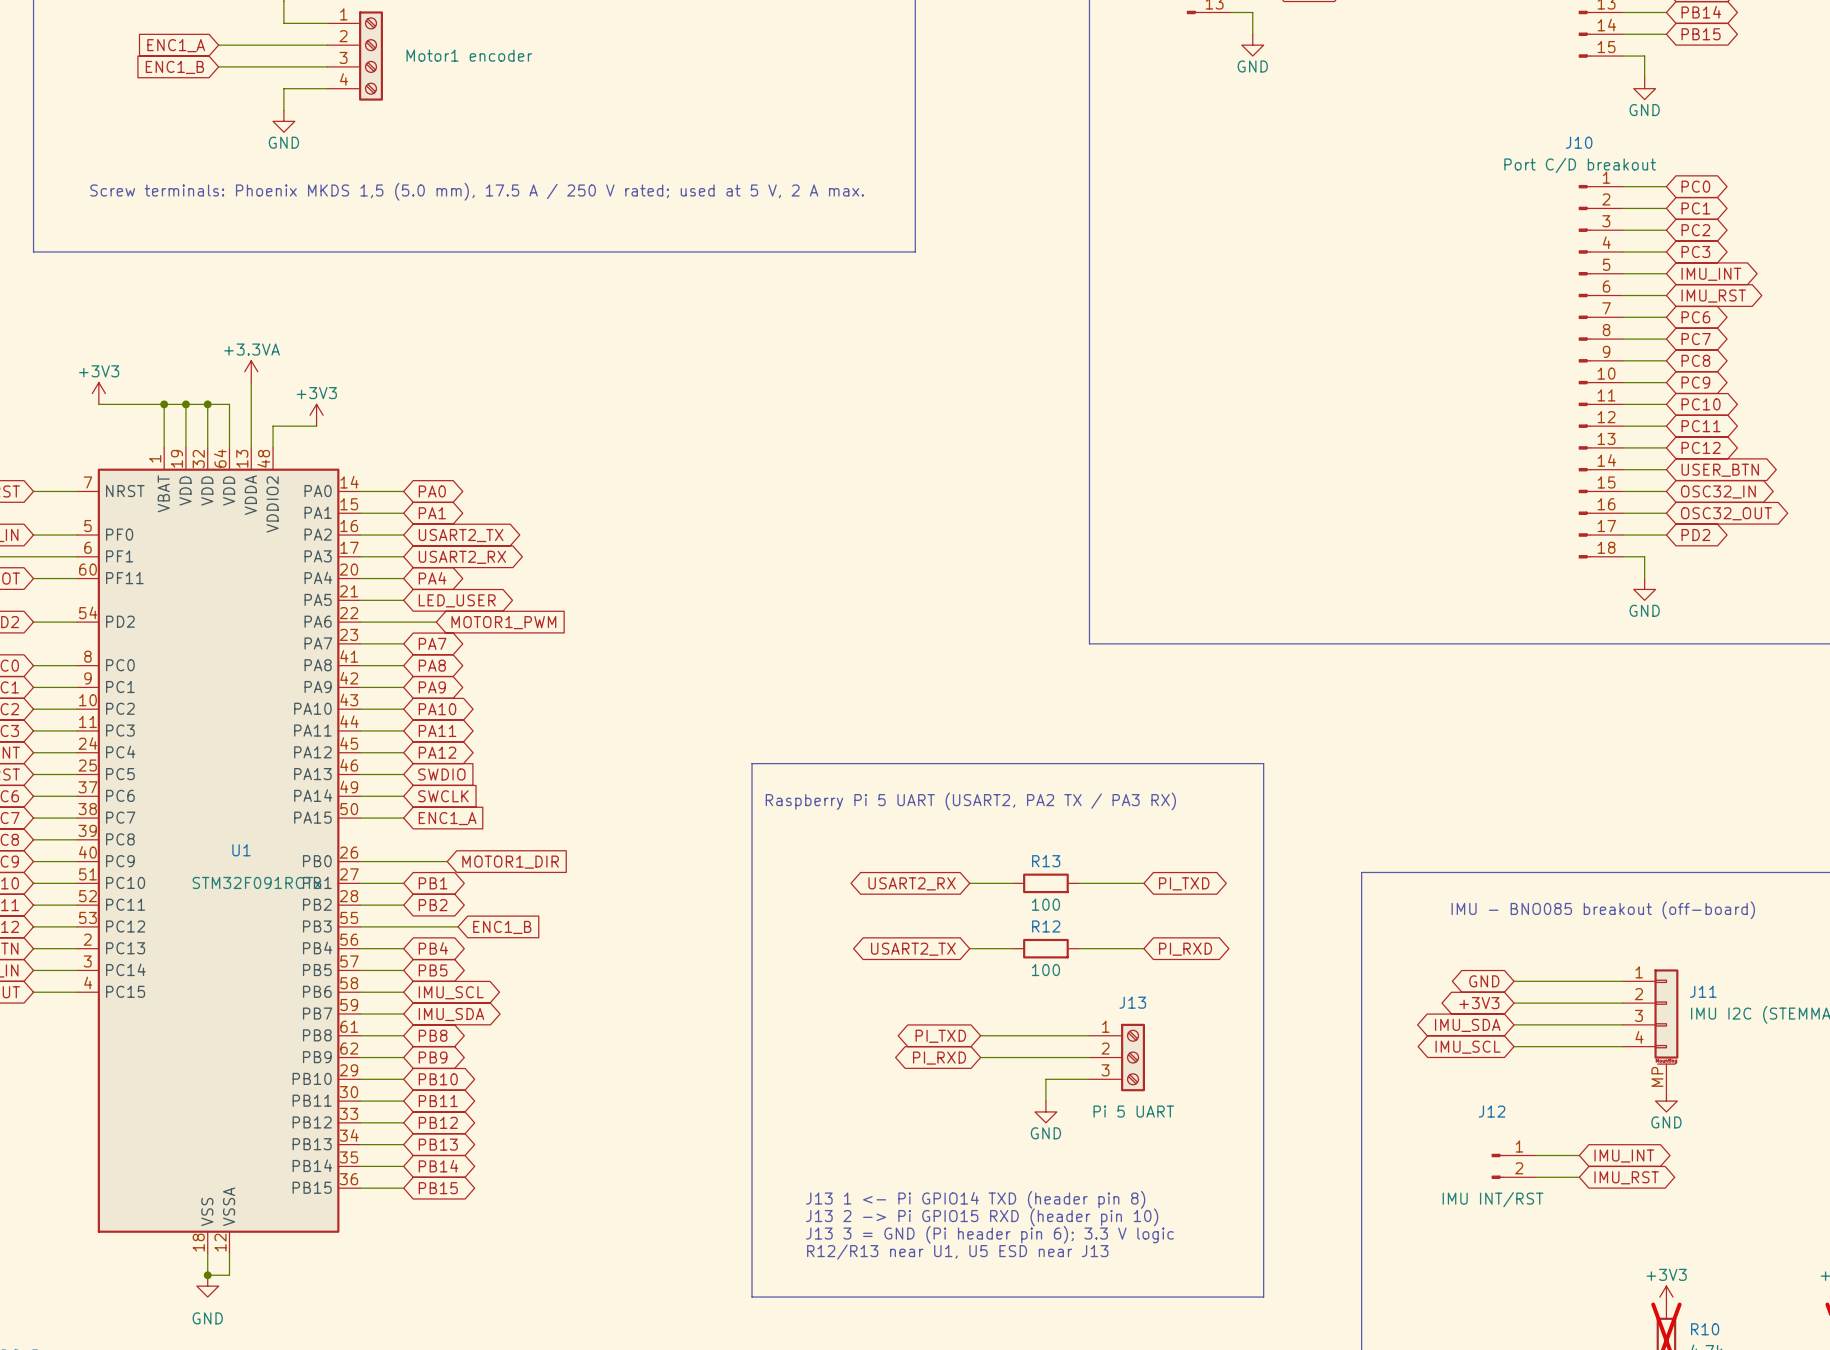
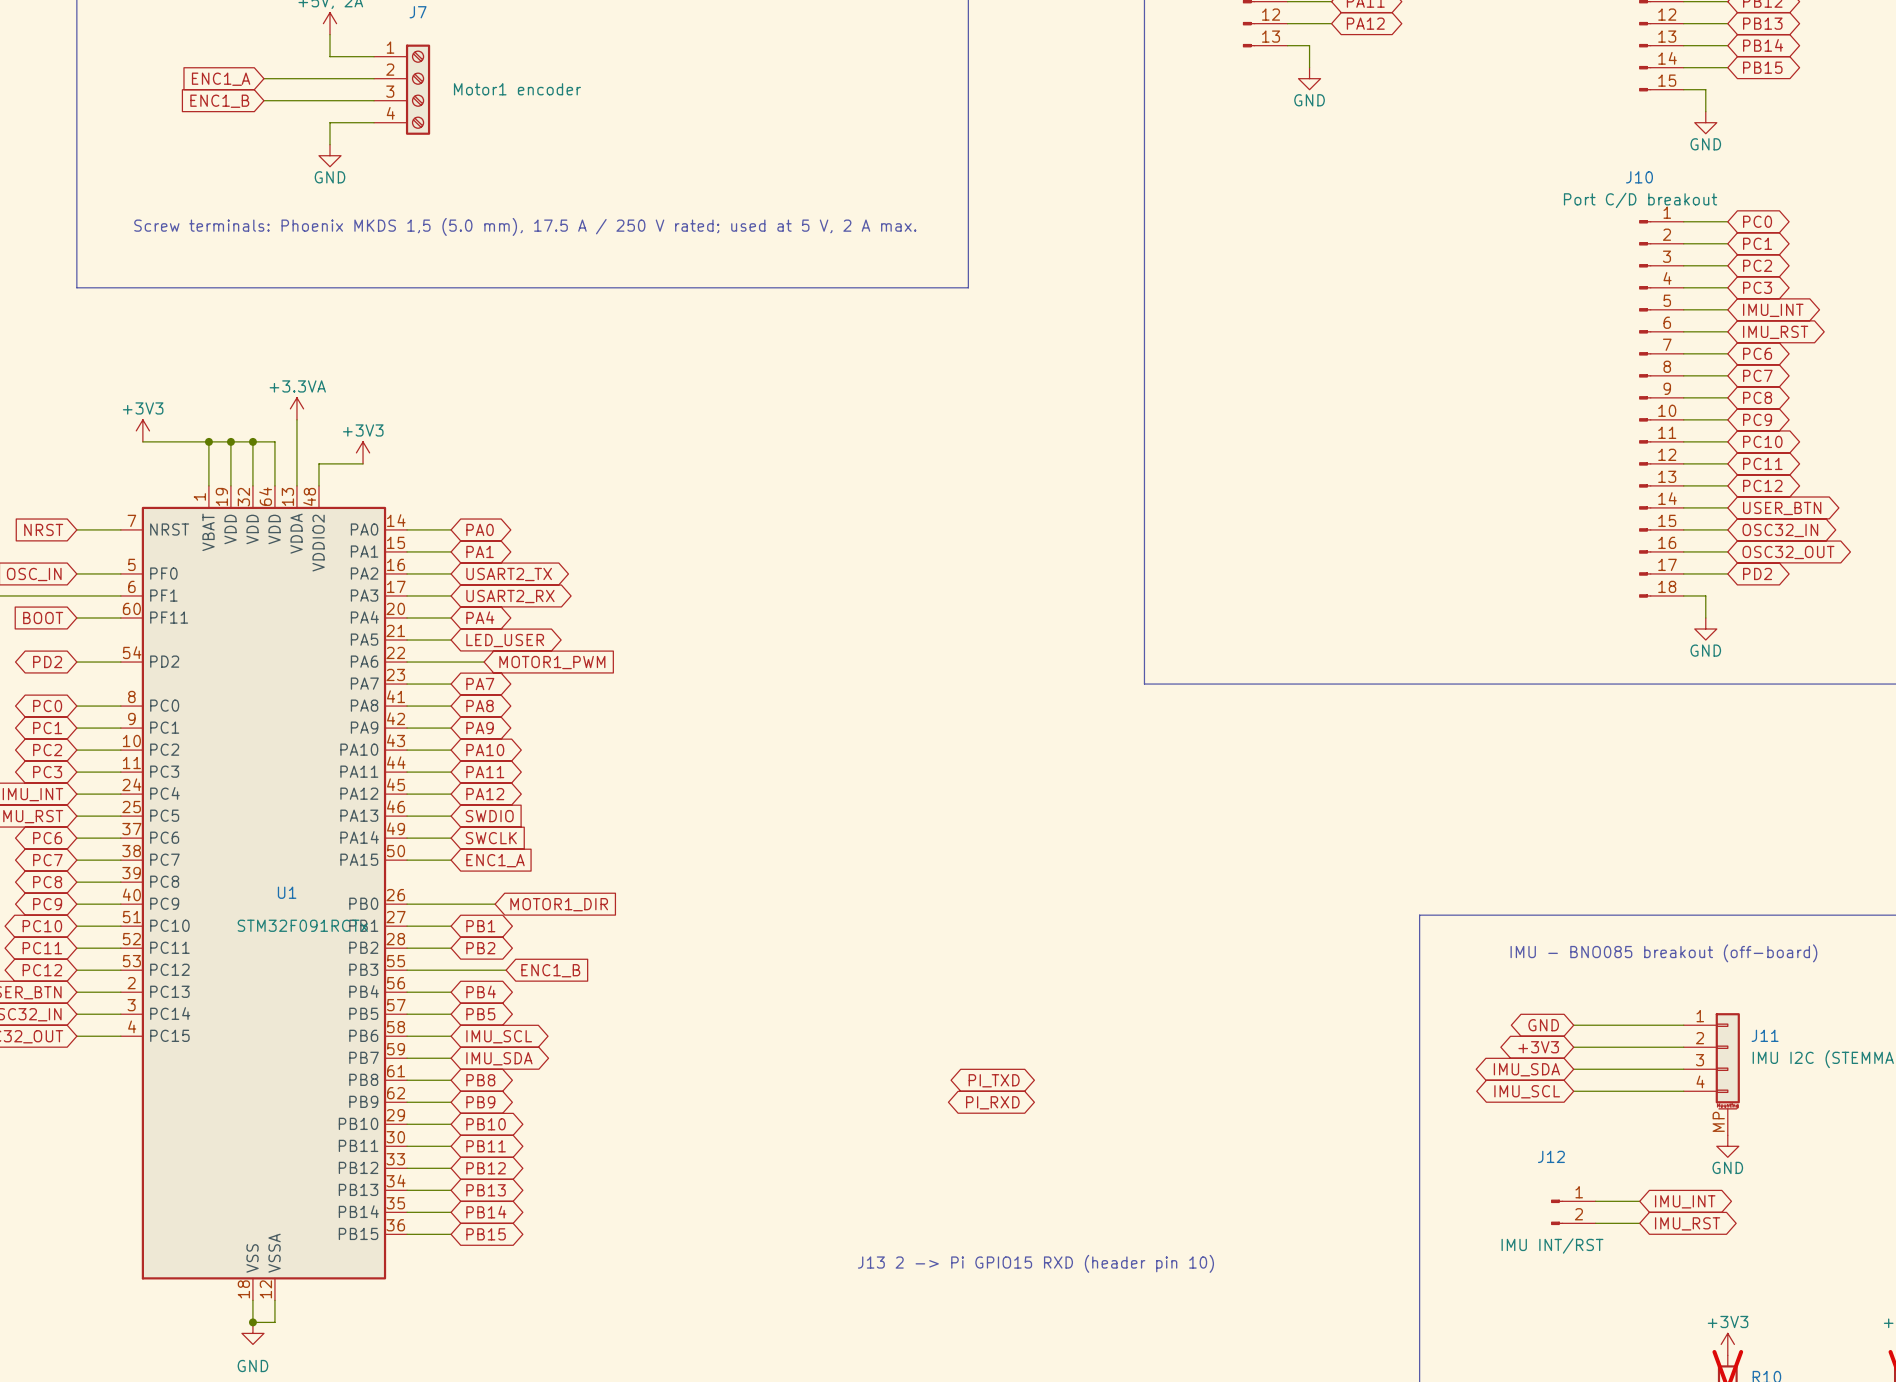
line: (752, 763) (1263, 763) (1263, 1297) (752, 1297) (752, 763) -> none
text: Raspberry Pi 5 UART (USART2, PA2 TX / PA3 RX) (970, 801) -> none
global label: USART2_RX (912, 883) -> none
wire: (969, 883) (1013, 883) -> none
R13: 100 (1045, 883) -> none
wire: (1078, 883) (1143, 883) -> none
global label: PI_TXD (1184, 883) -> none
wire: (969, 948) (1013, 948) -> none
R12: 100 (1045, 948) -> none
wire: (1078, 948) (1143, 948) -> none
global label: USART2_TX (913, 949) -> none
global label: PI_RXD (1185, 949) -> none
wire: (980, 1035) (1089, 1035) -> none
wire: (980, 1057) (1089, 1057) -> none
J13: Pi 5 UART (1117, 1057) -> none
wire: (1089, 1079) (1045, 1079) (1045, 1101) -> none
power symbol: GND (1045, 1111) -> none
text: J13 1 <- Pi GPIO14 TXD (header pin 8) (975, 1199) -> none
text: J13 3 = GND (Pi header pin 6); 3.3 V logic (989, 1234) -> none
text: R12/R13 near U1, U5 ESD near J13 (957, 1252) -> none

